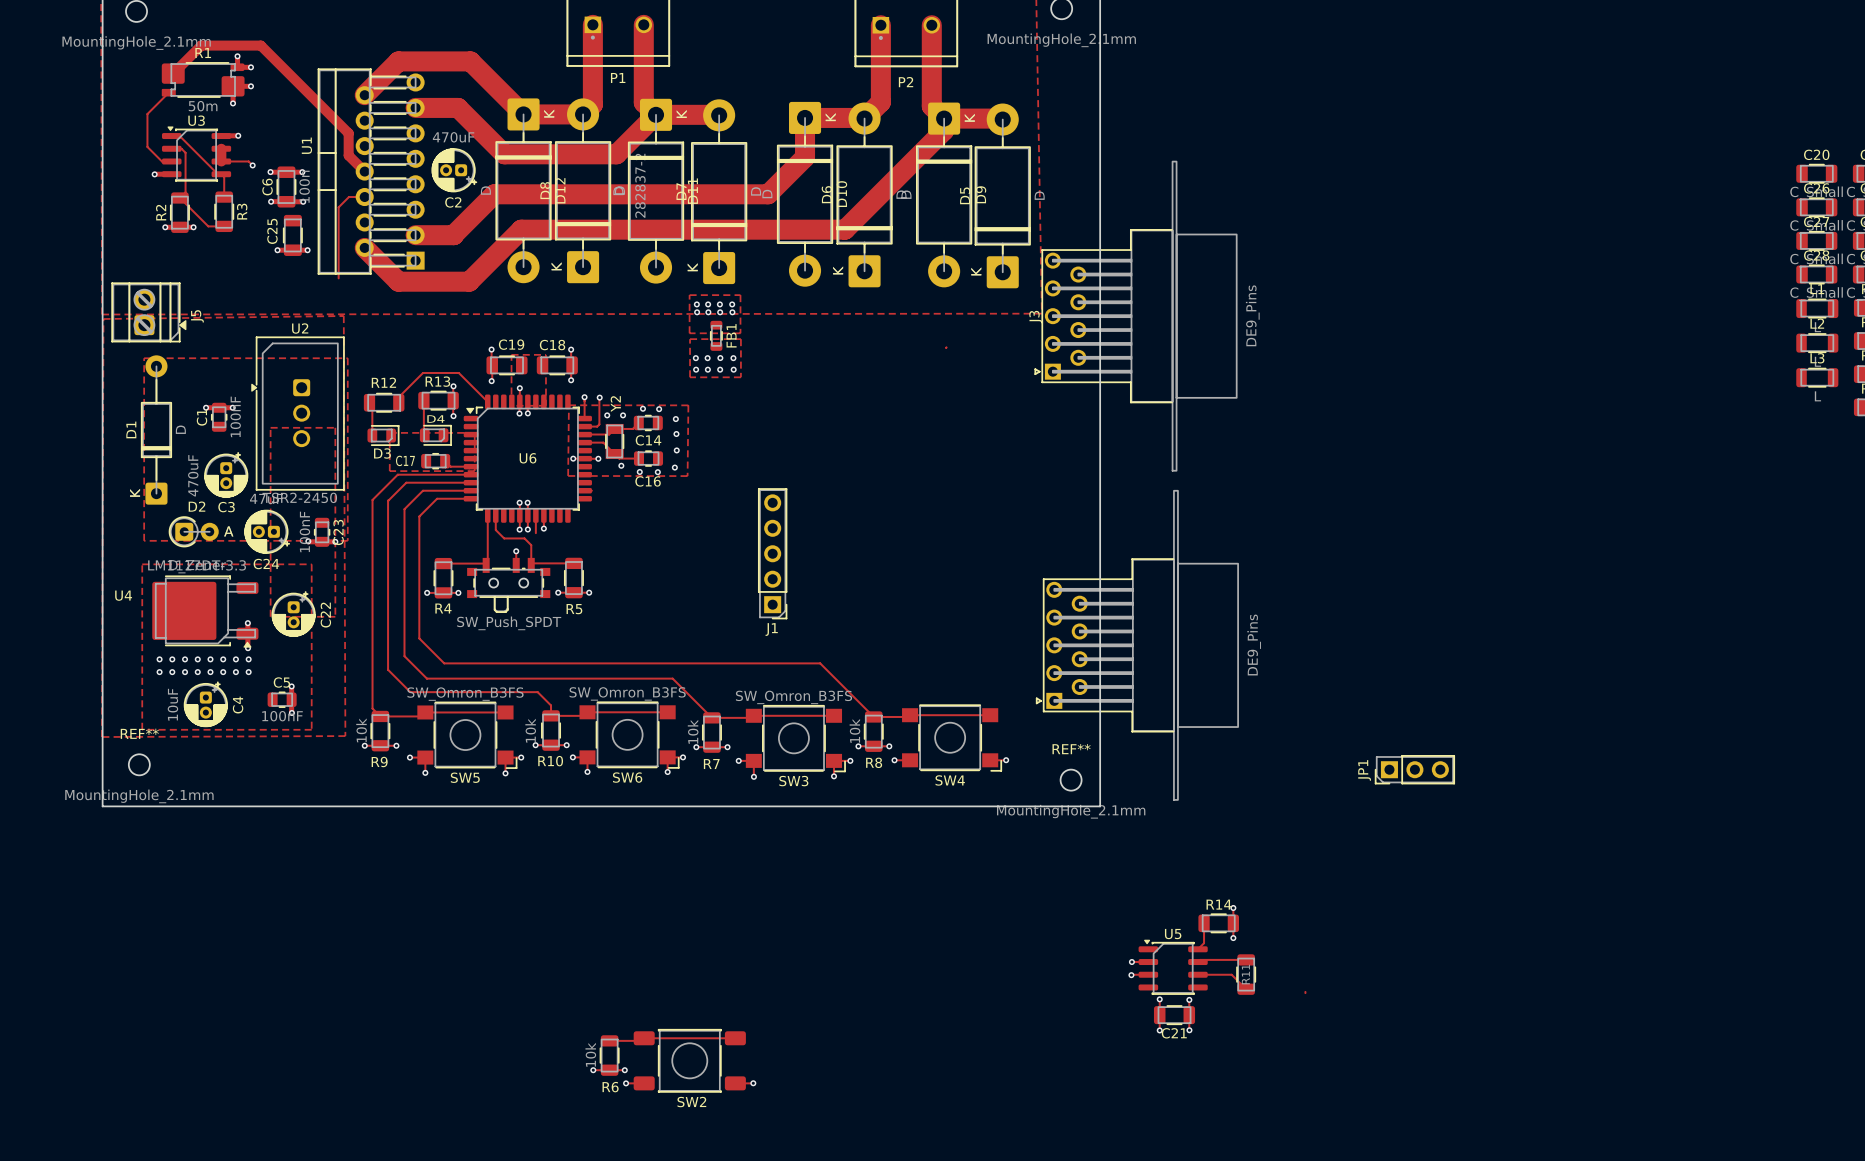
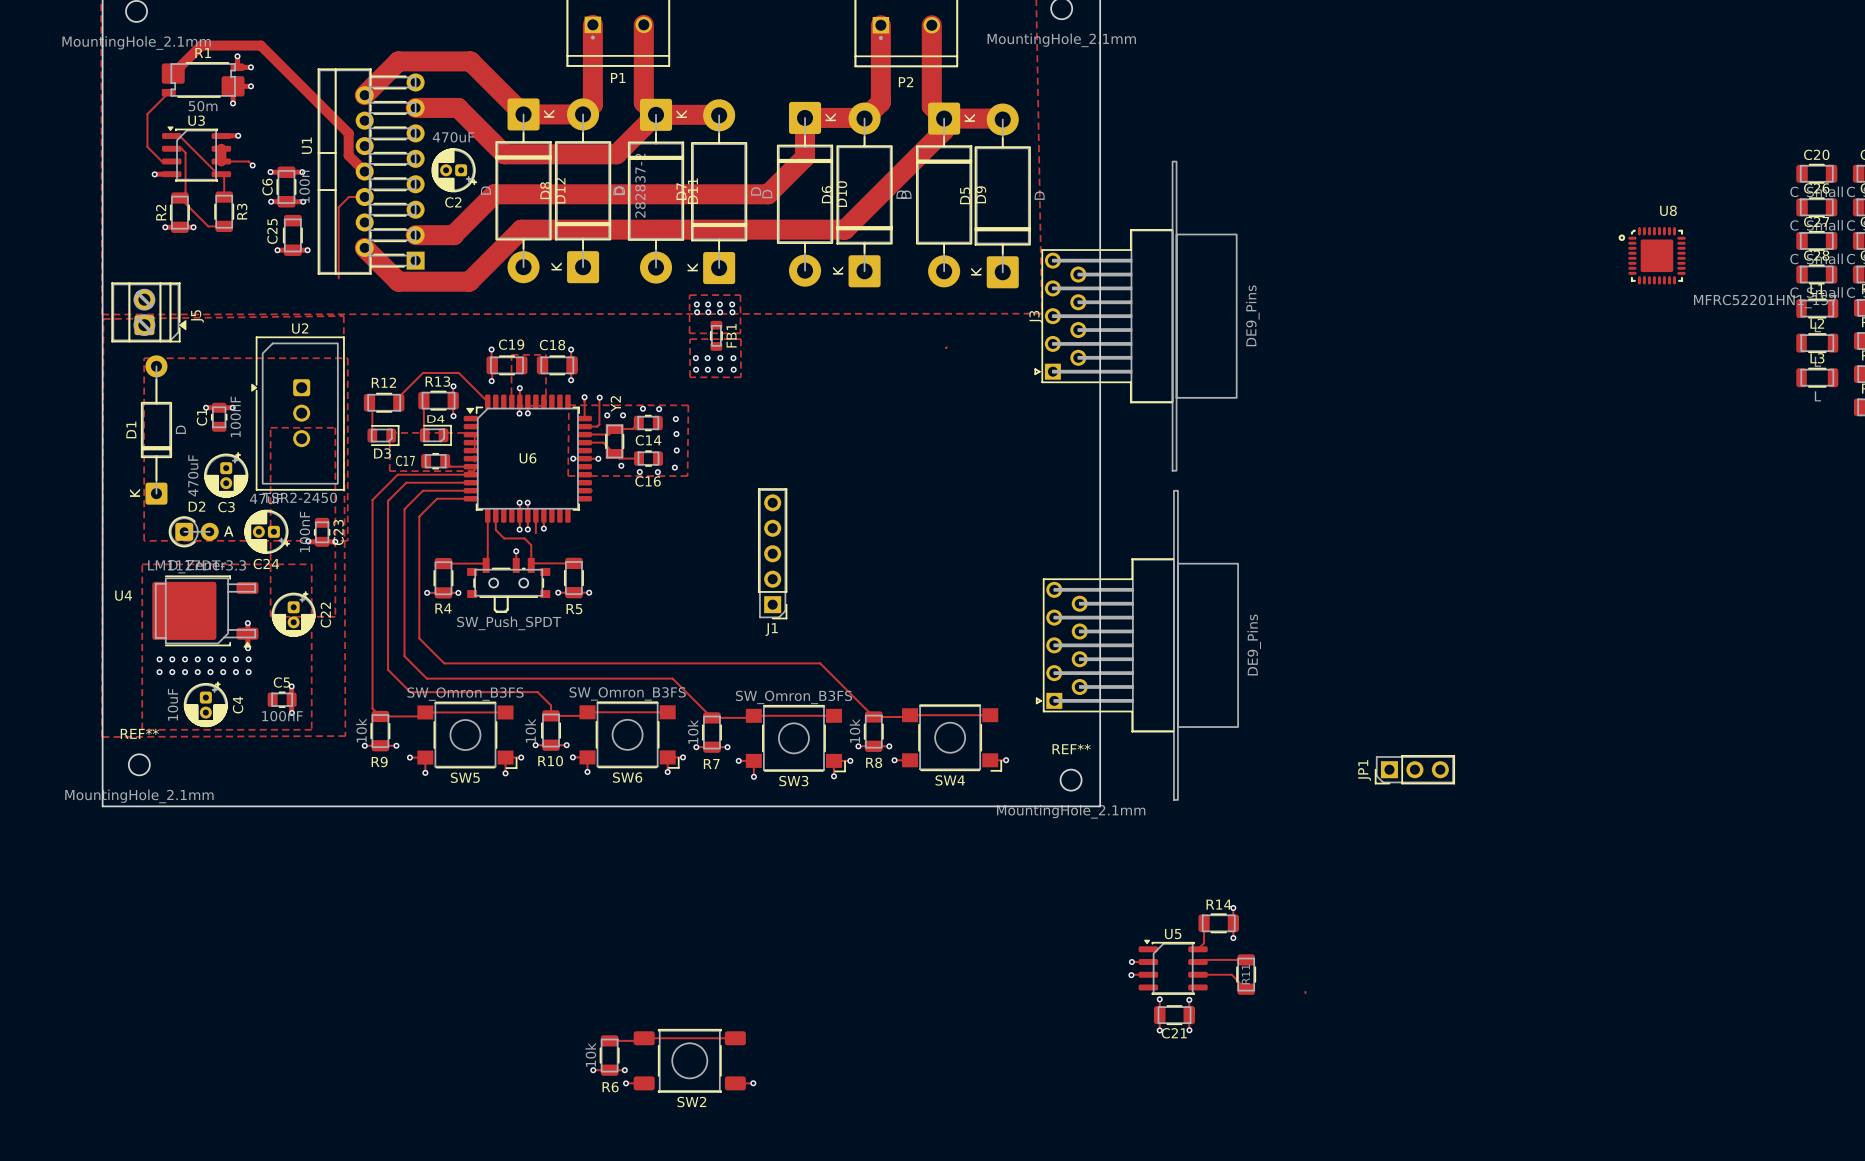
U8: none -> MFRC52201HN1_157 (1652, 255)

